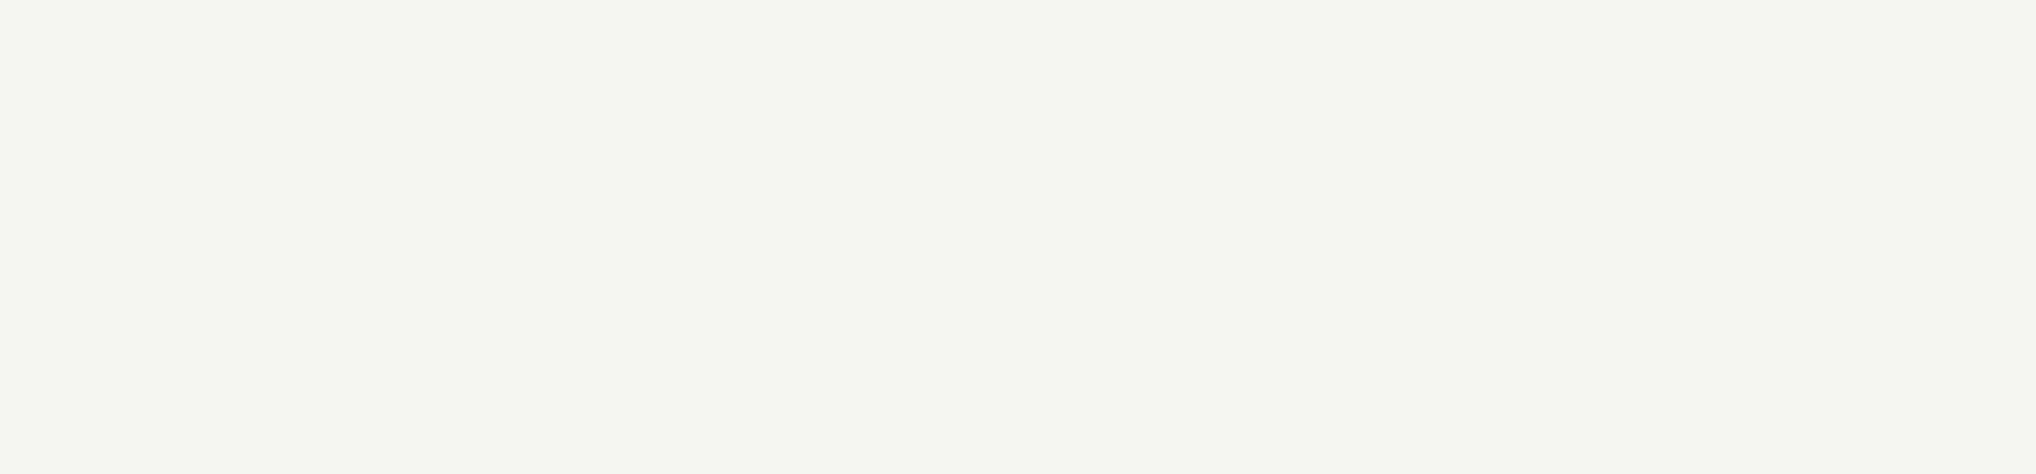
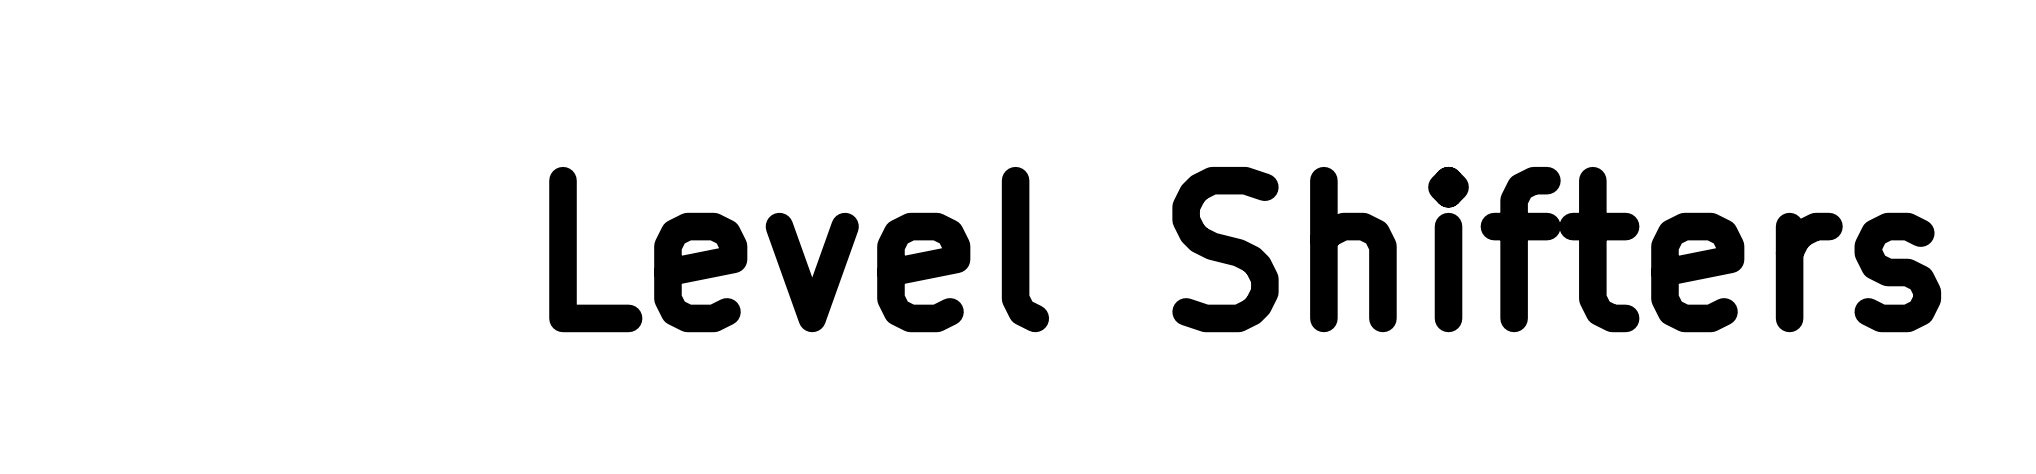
text: none -> Level Shifters (1245, 249)

